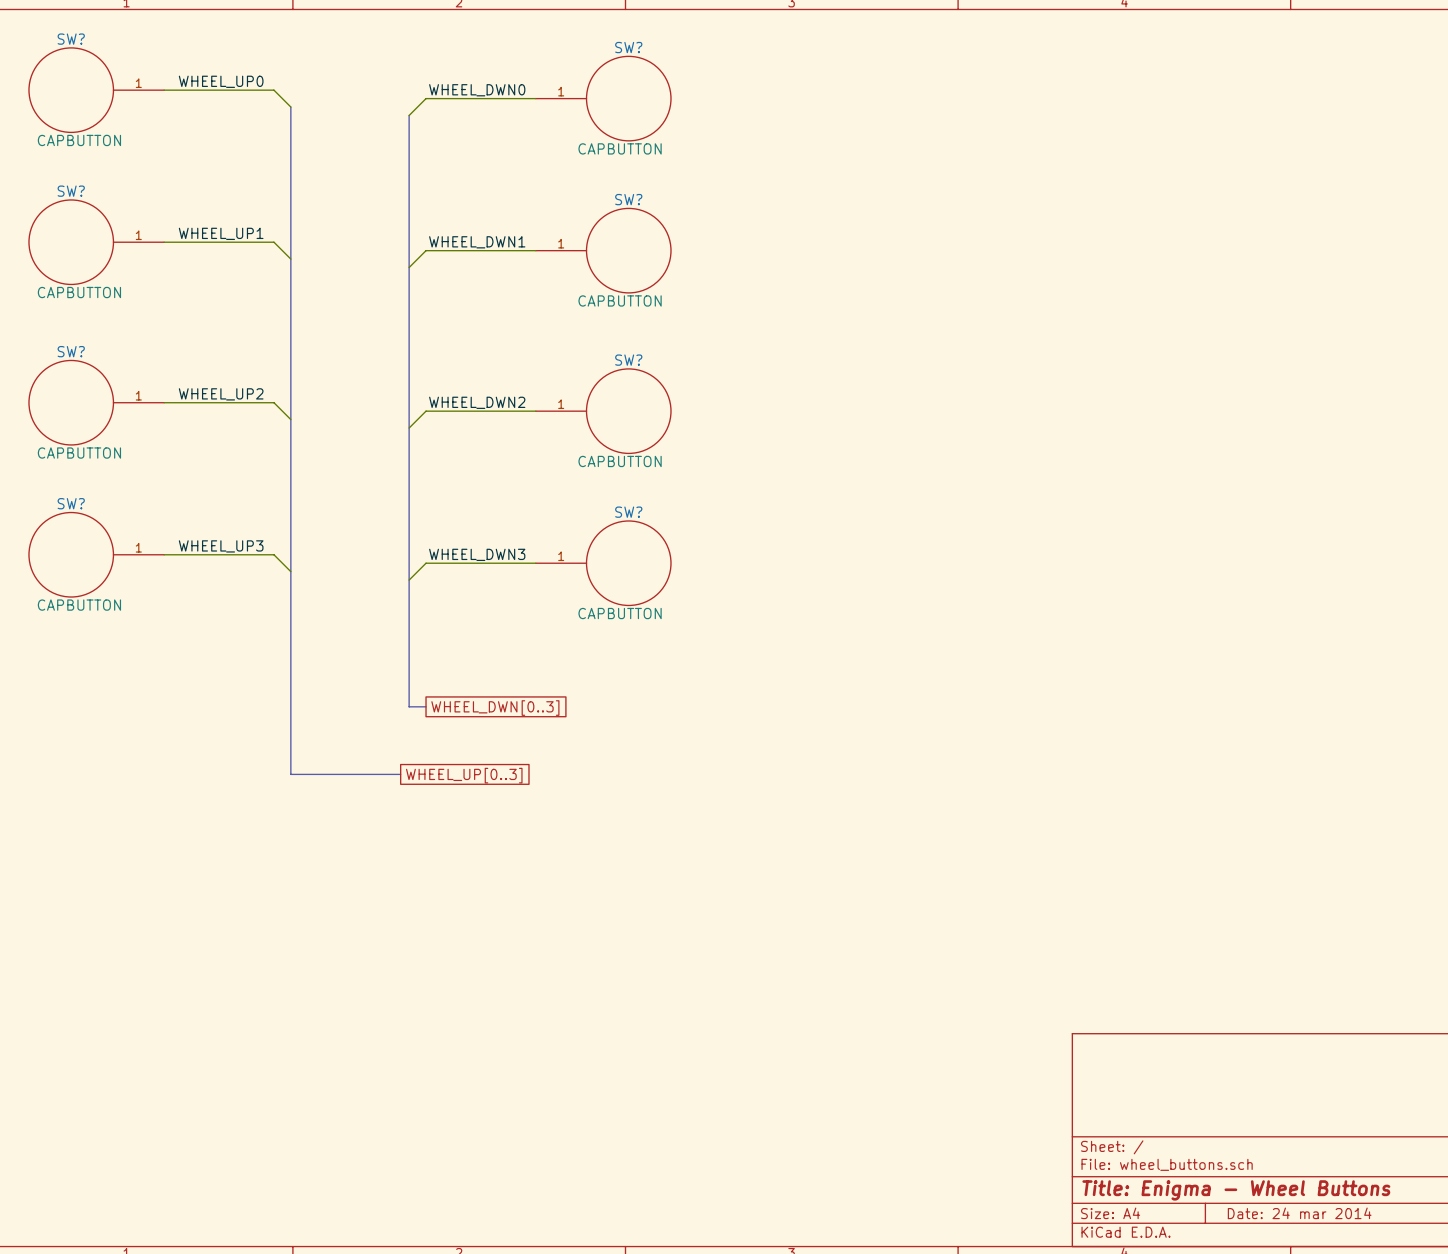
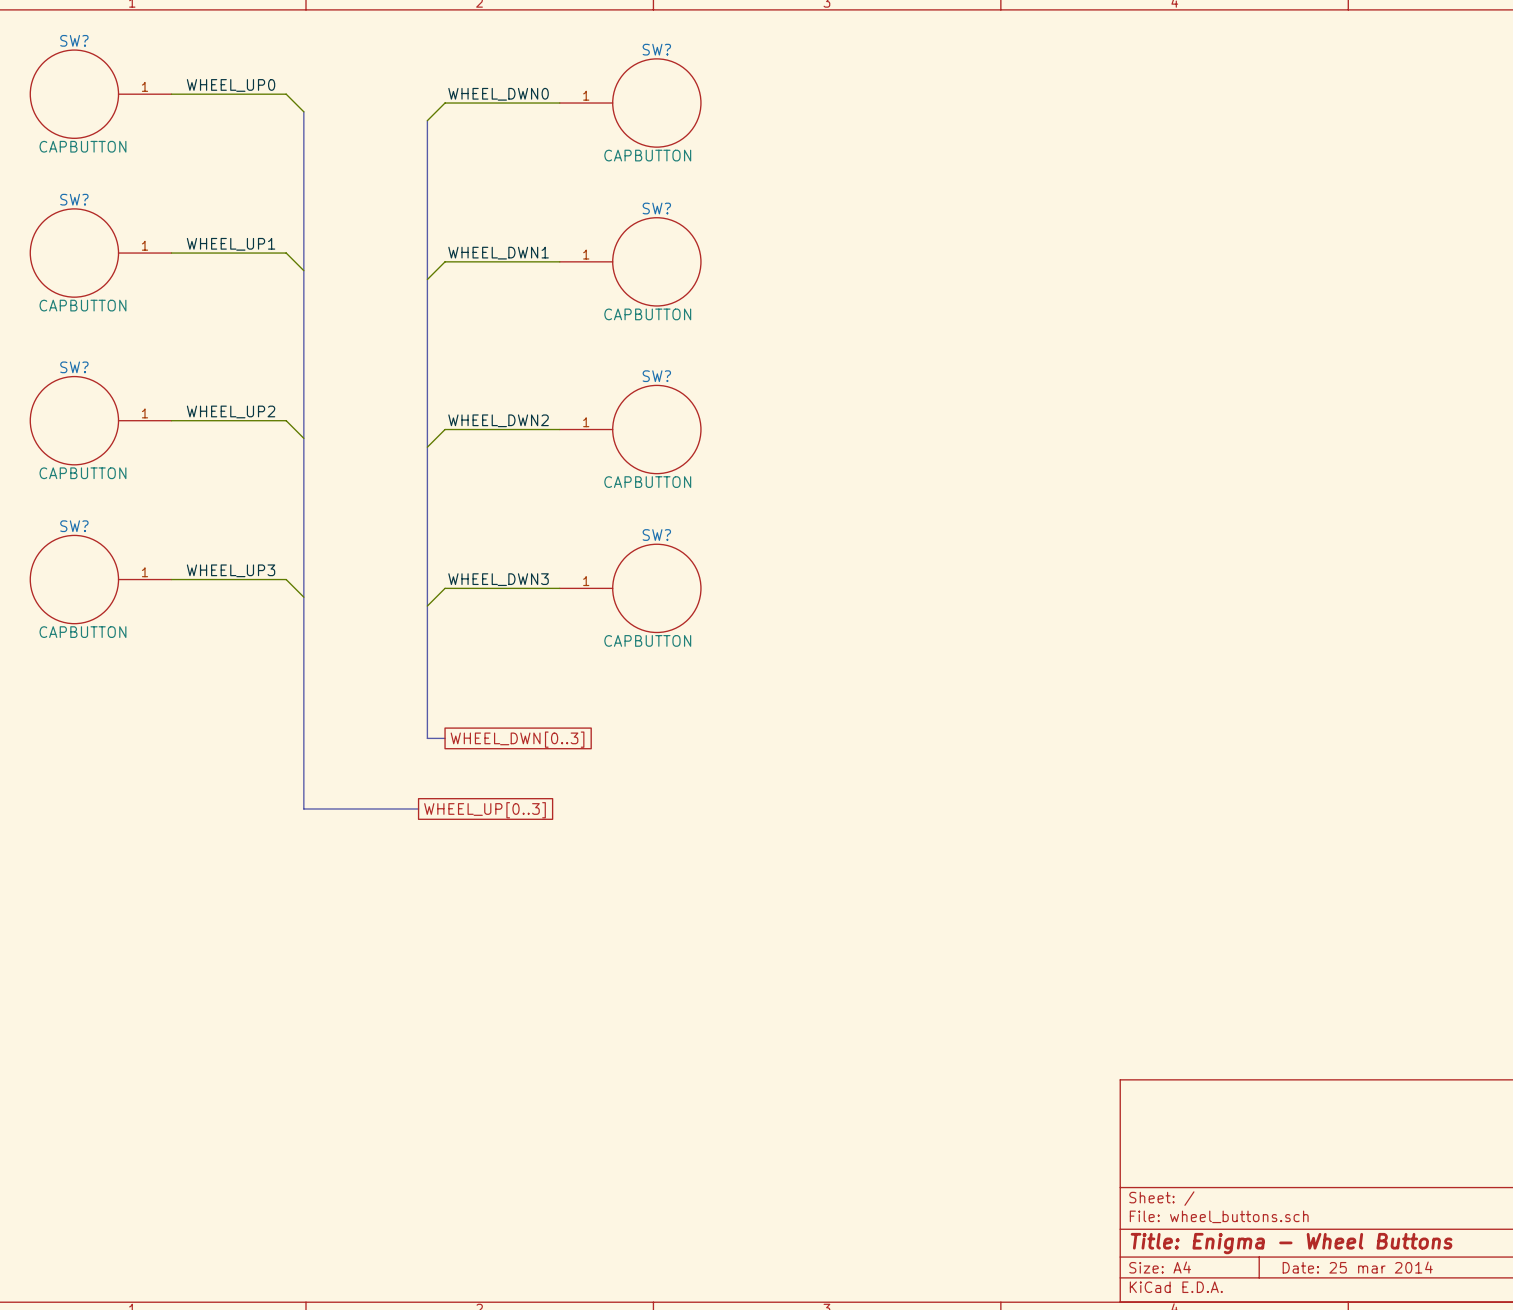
title block: Date: 24 mar 2014 (1299, 1213) -> Date: 25 mar 2014 (1357, 1267)

